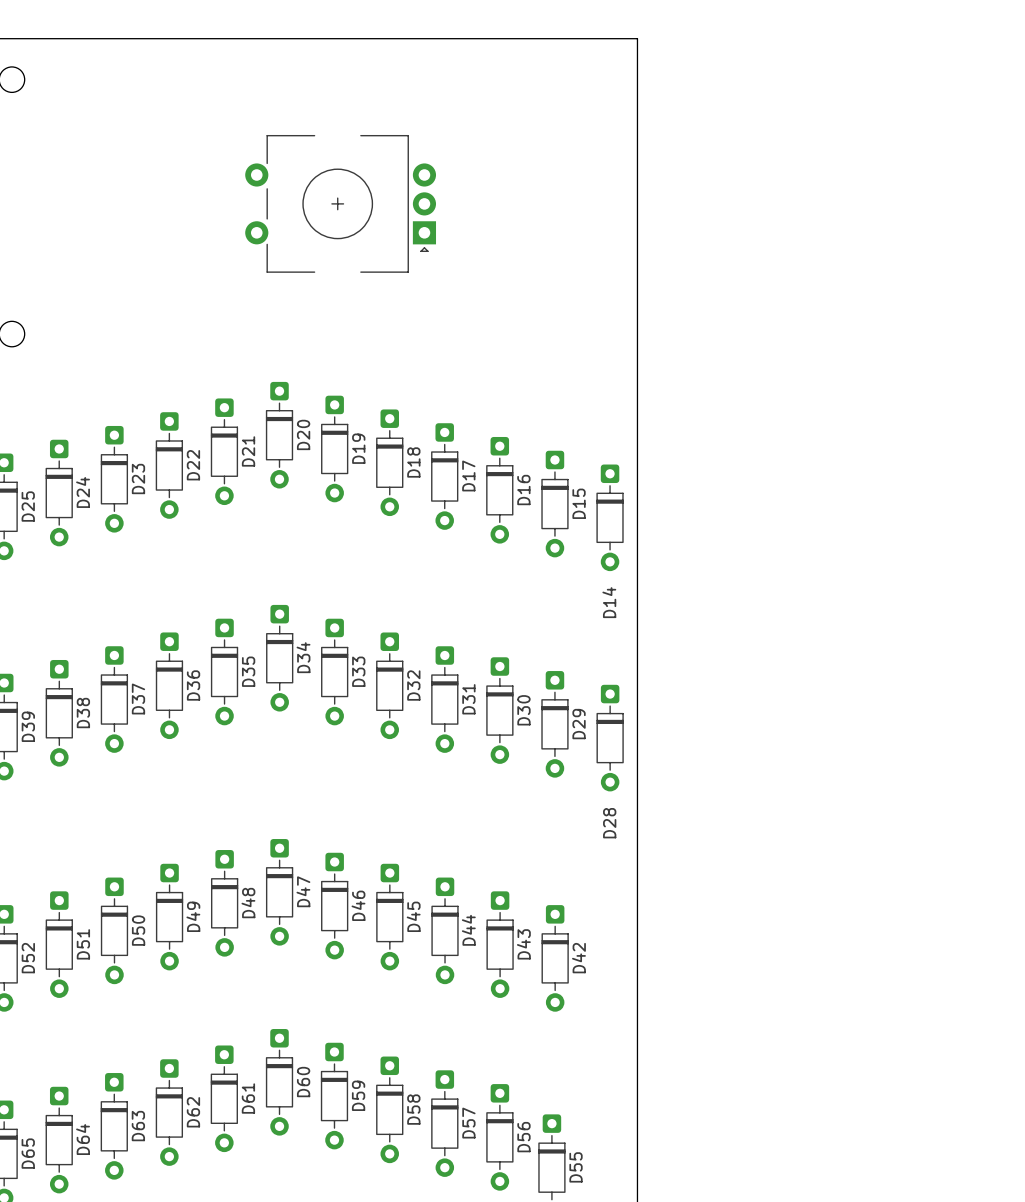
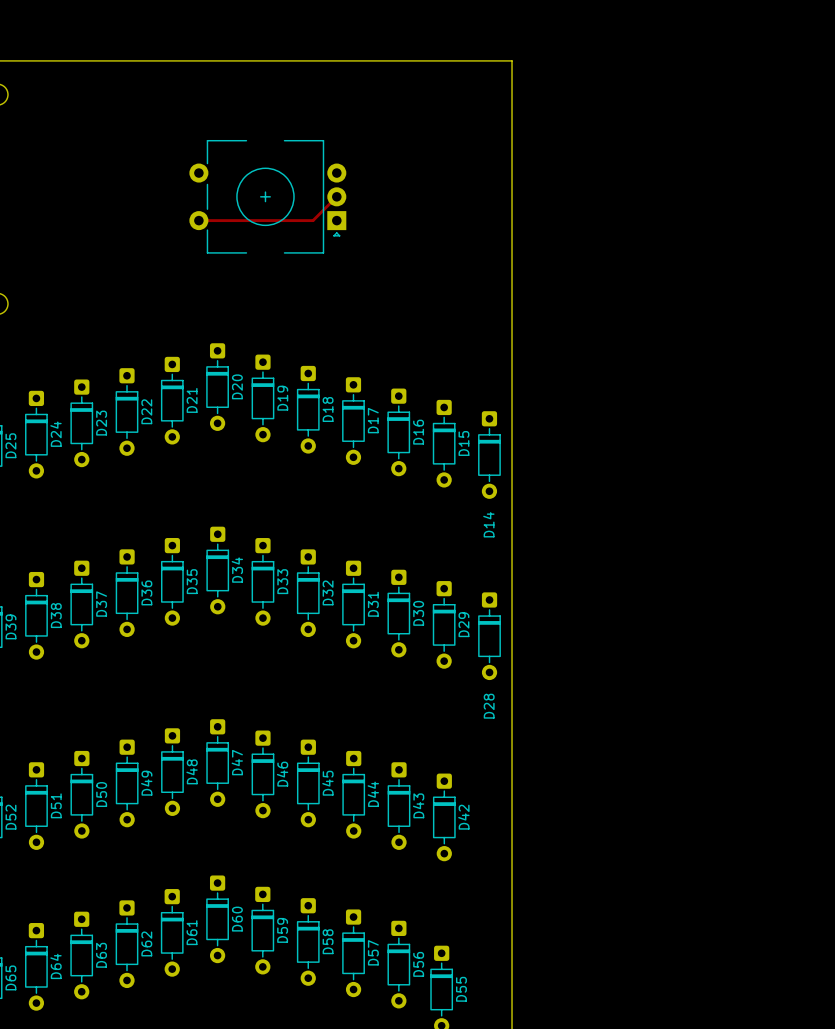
track: none -> (336, 196) (313, 220) (198, 220)

